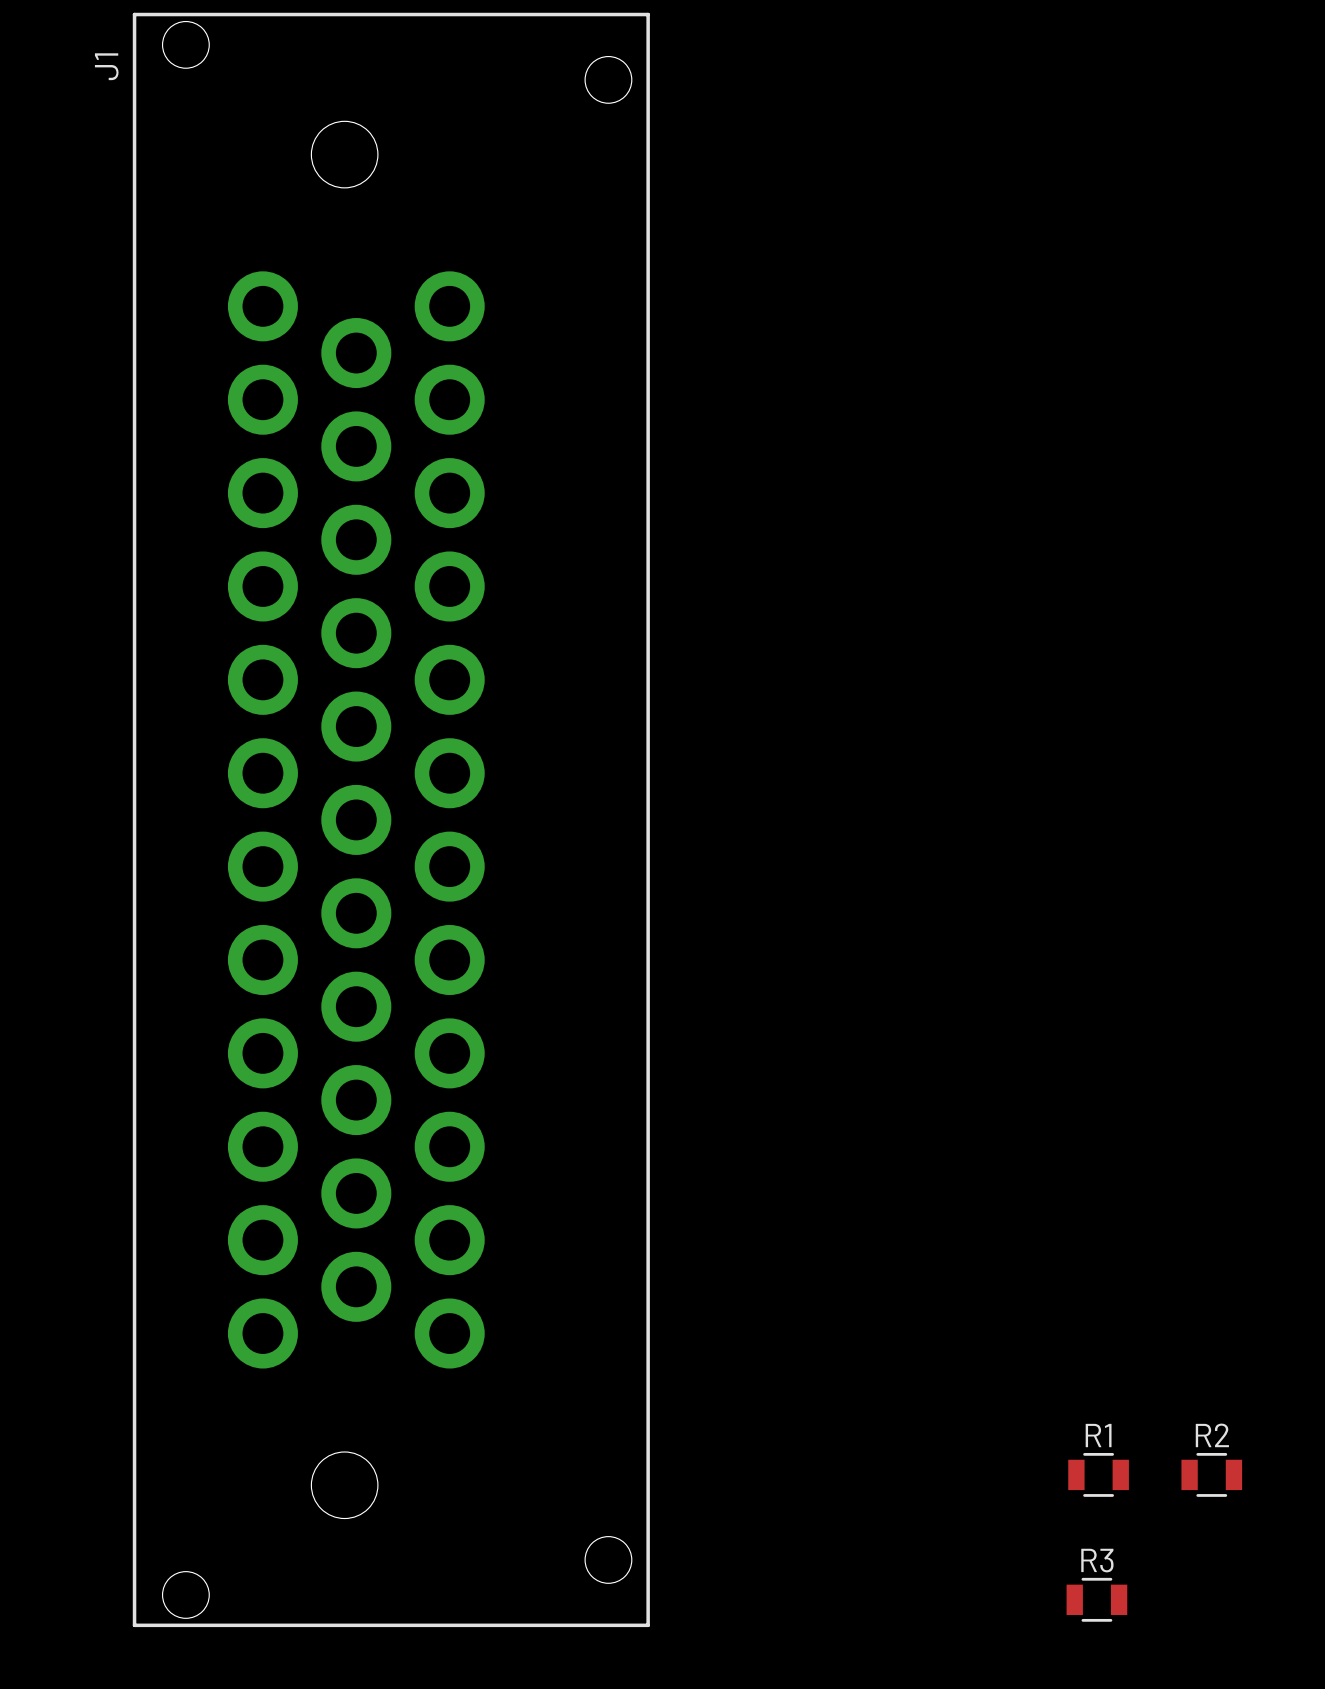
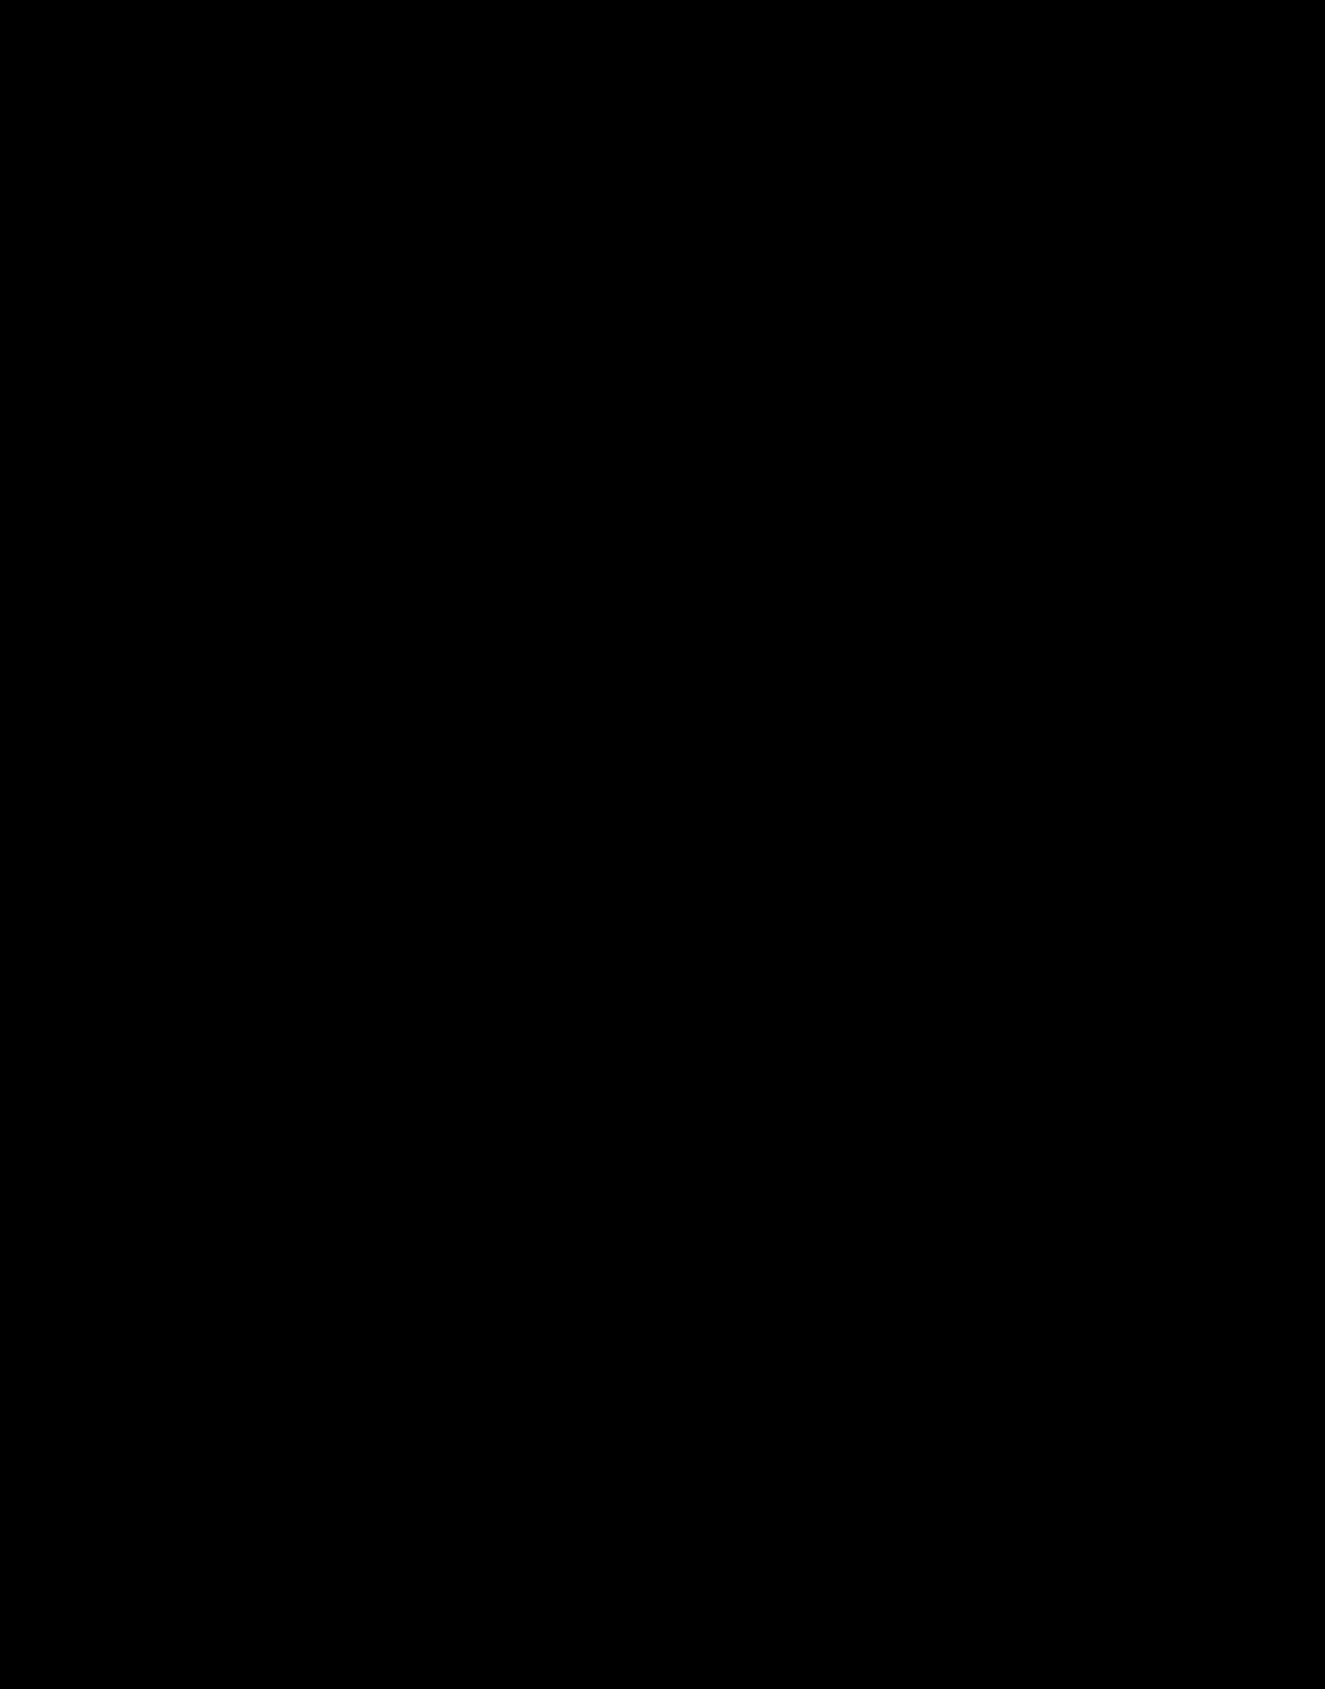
J1: (391, 819) -> none
R1: (1098, 1474) -> none
R2: (1211, 1474) -> none
R3: (1096, 1599) -> none

